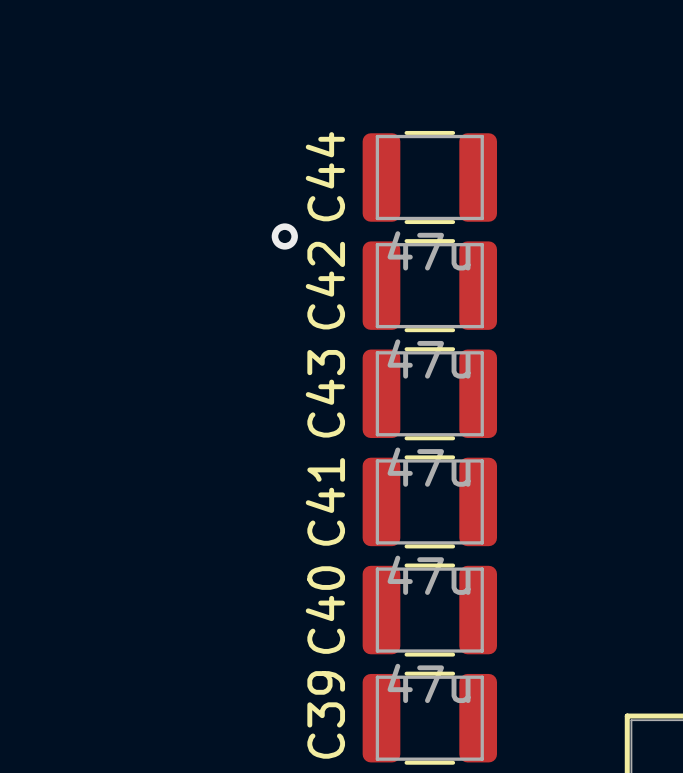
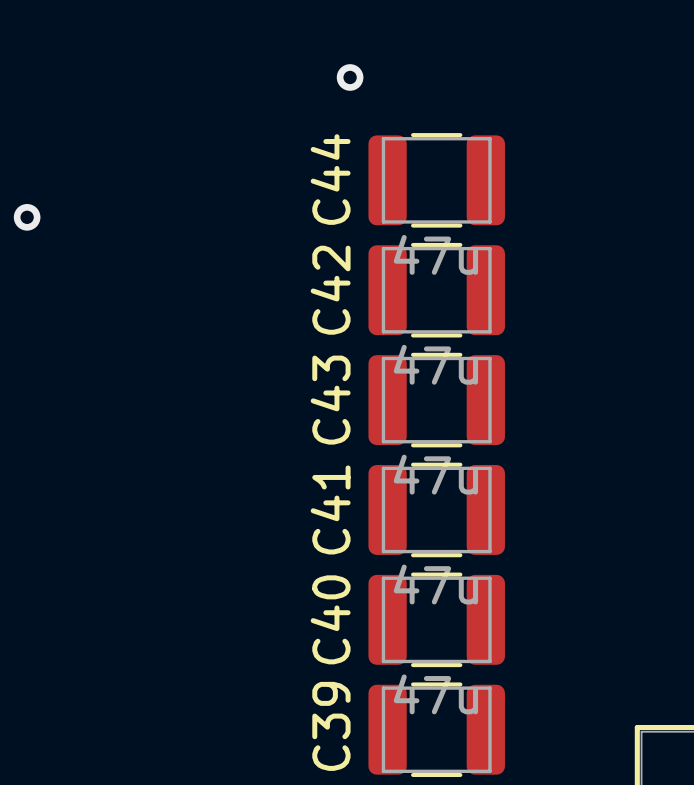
via: none -> (350, 77)
via: none -> (27, 217)
via: (284, 236) -> none

